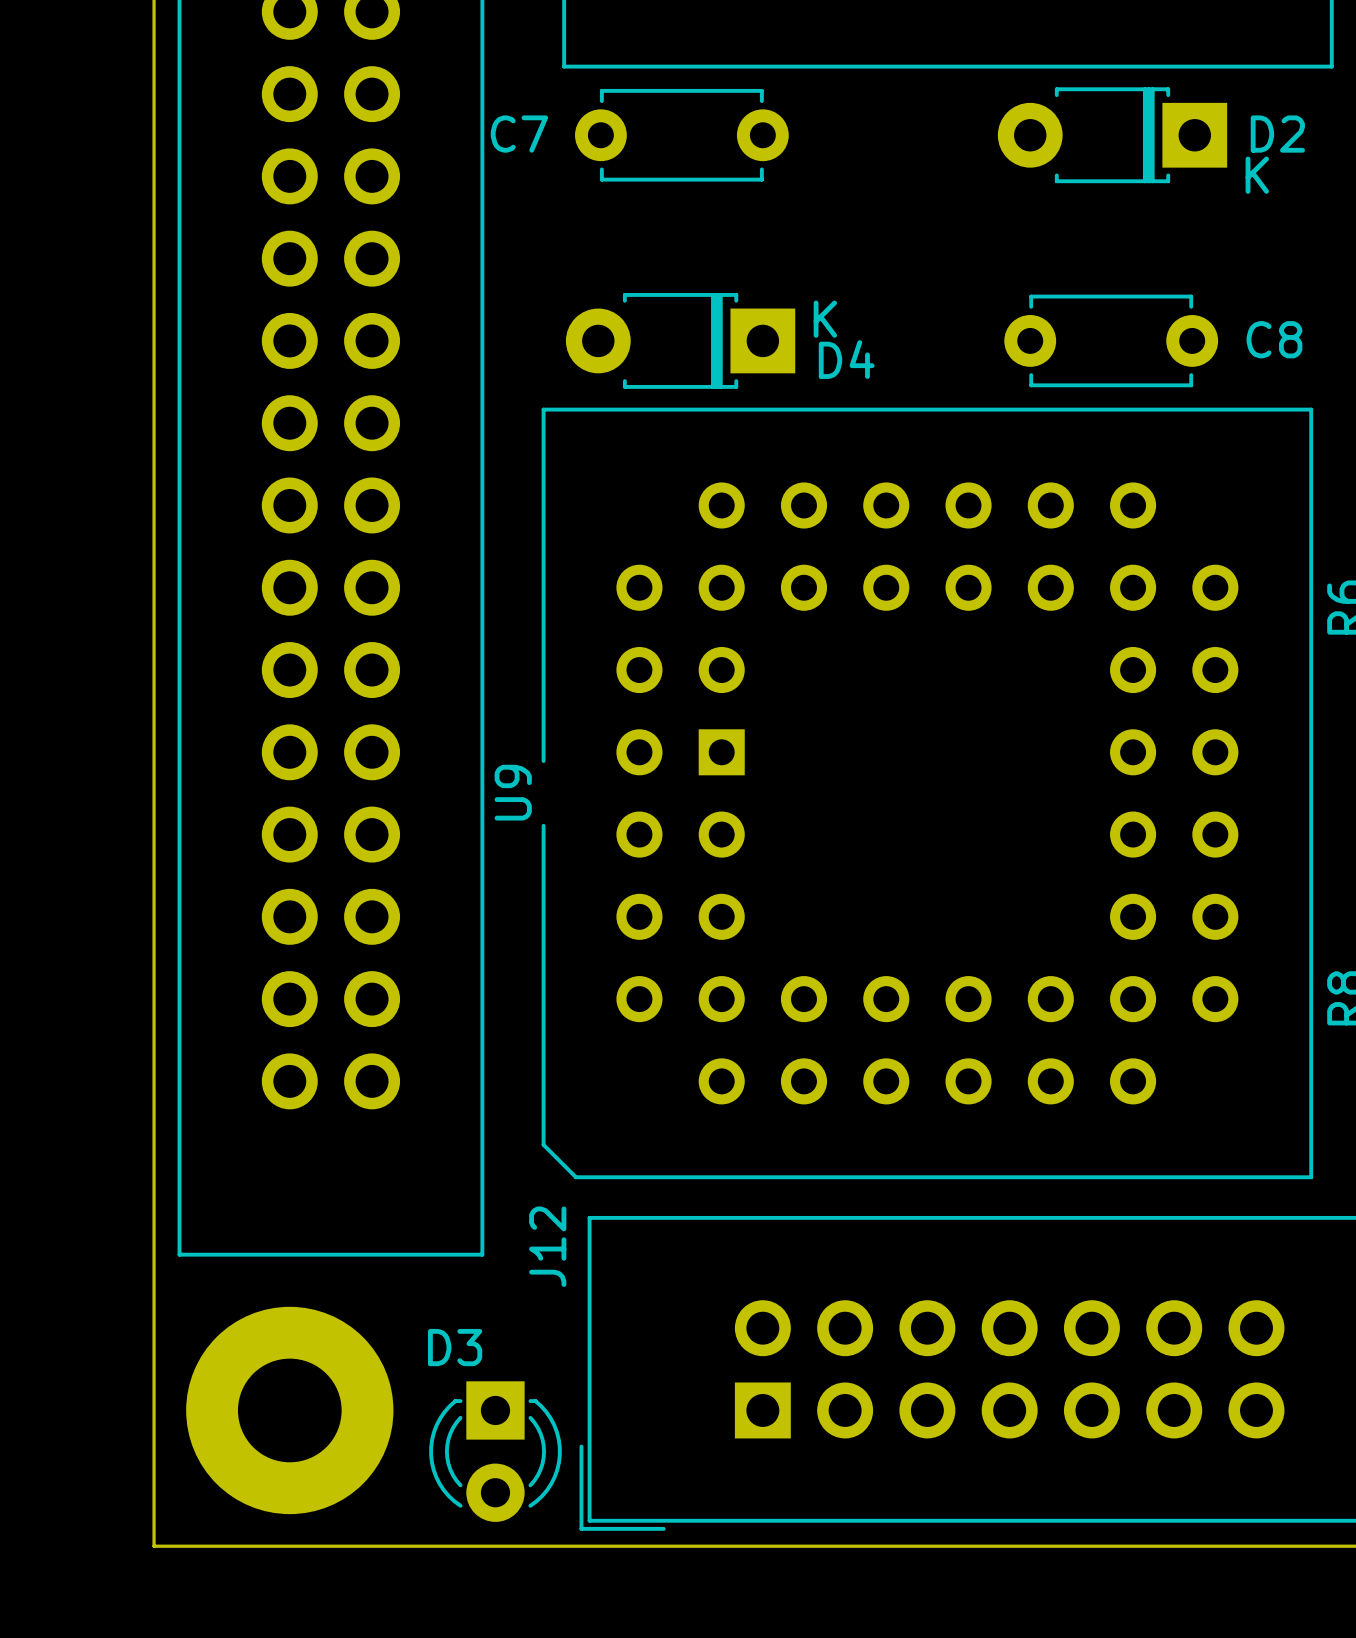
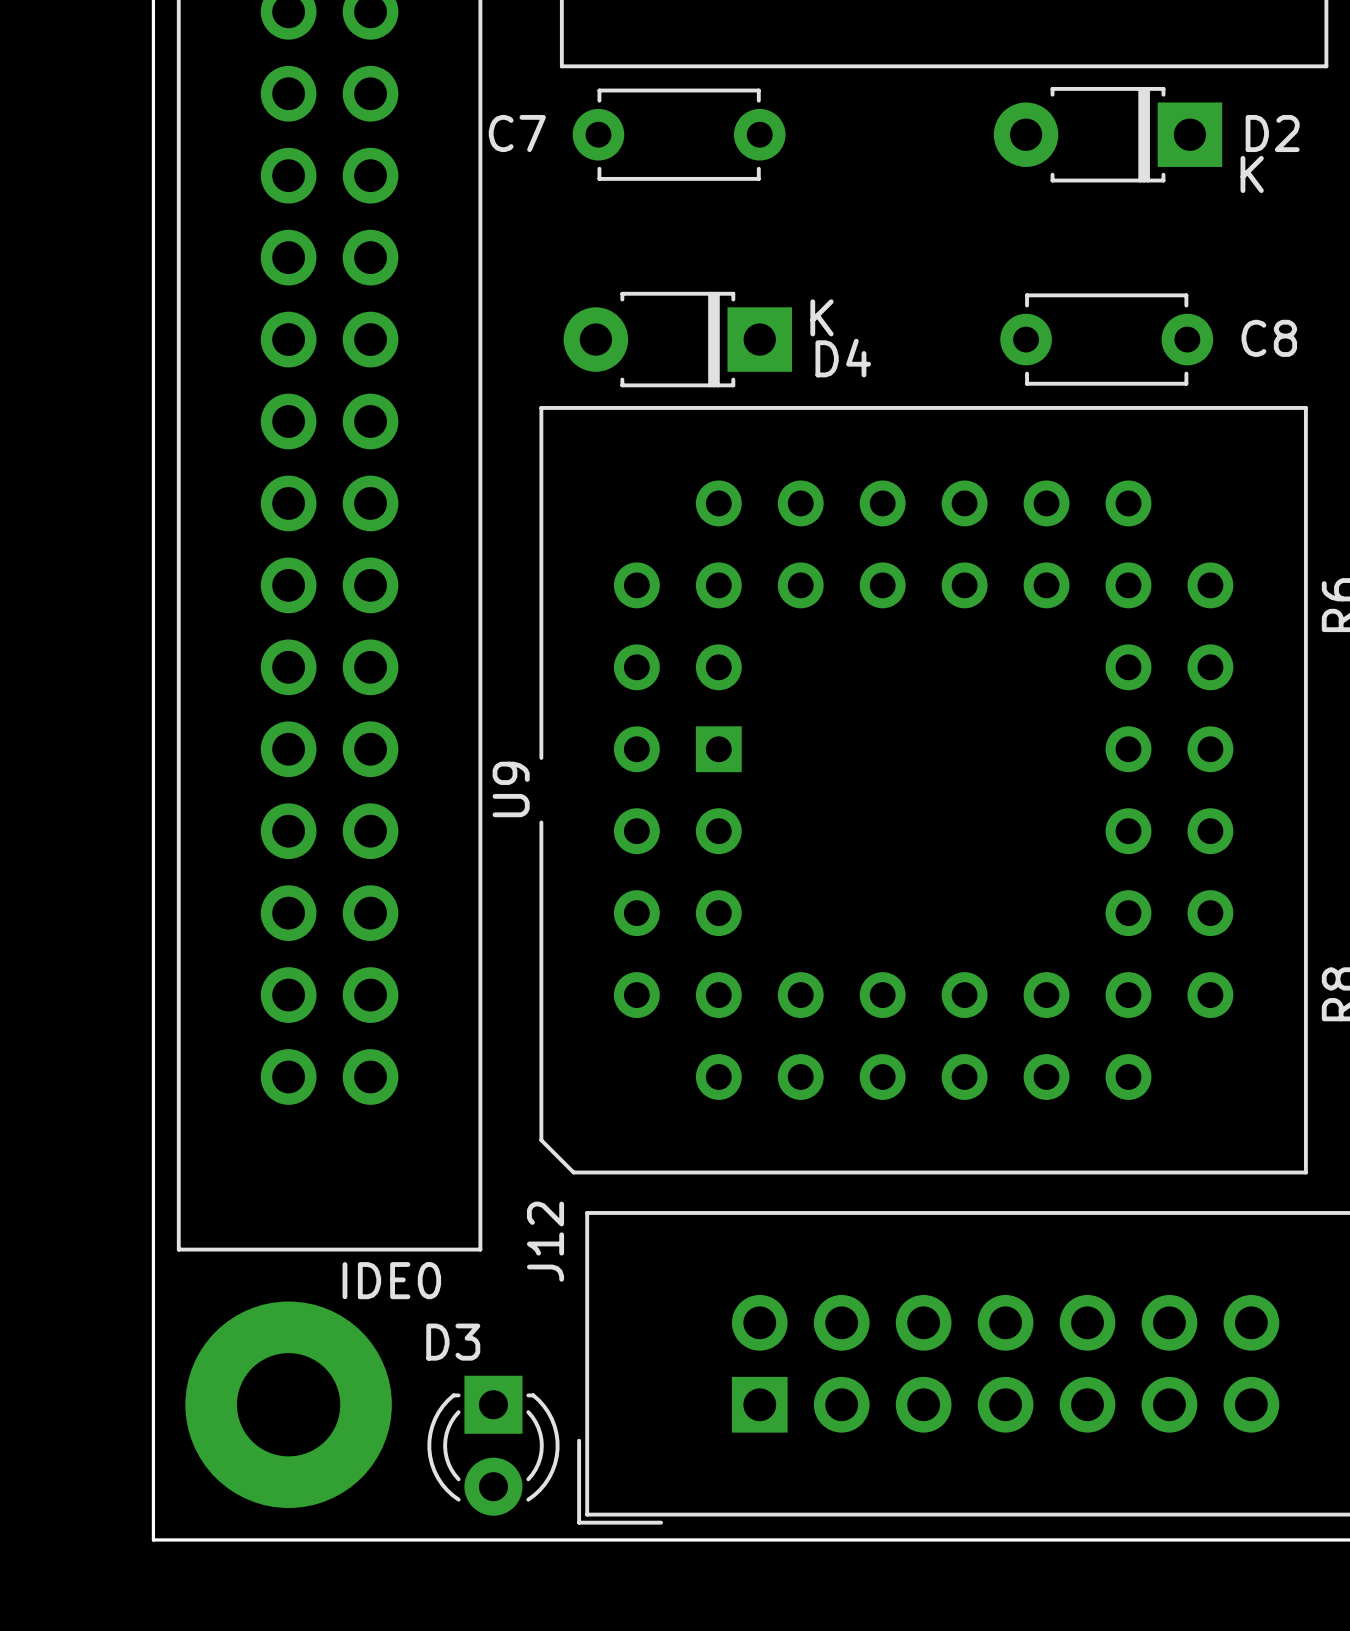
part value: none -> IDE0 (391, 1280)

